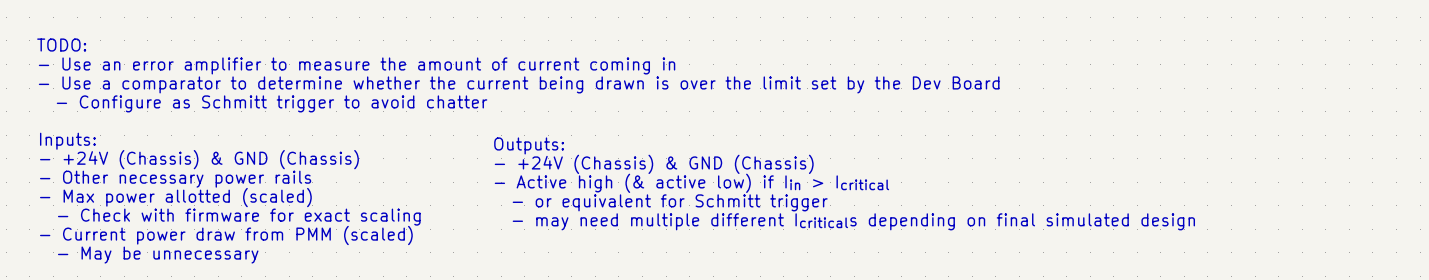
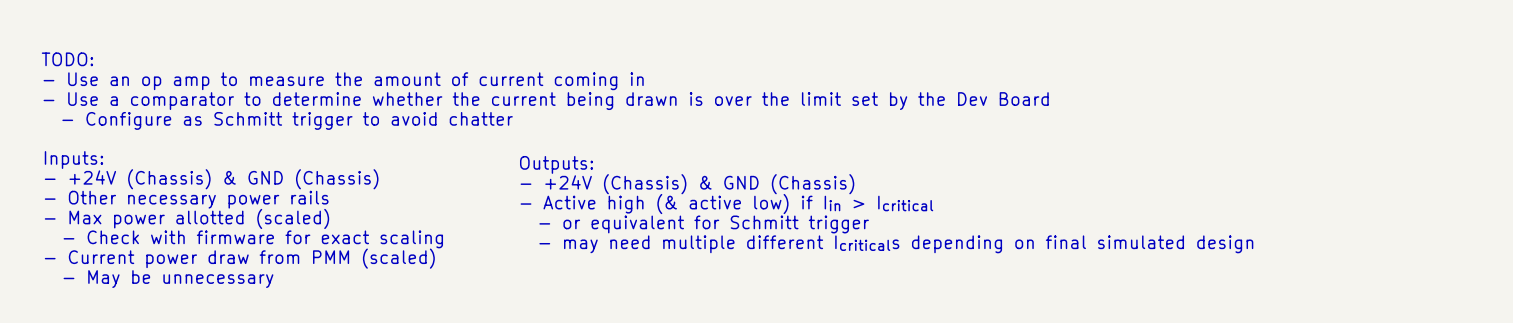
text: - Use an error amplifier to measure the amount of current coming in (357, 65) -> - Use an op amp to measure the amount of current coming in (343, 81)

